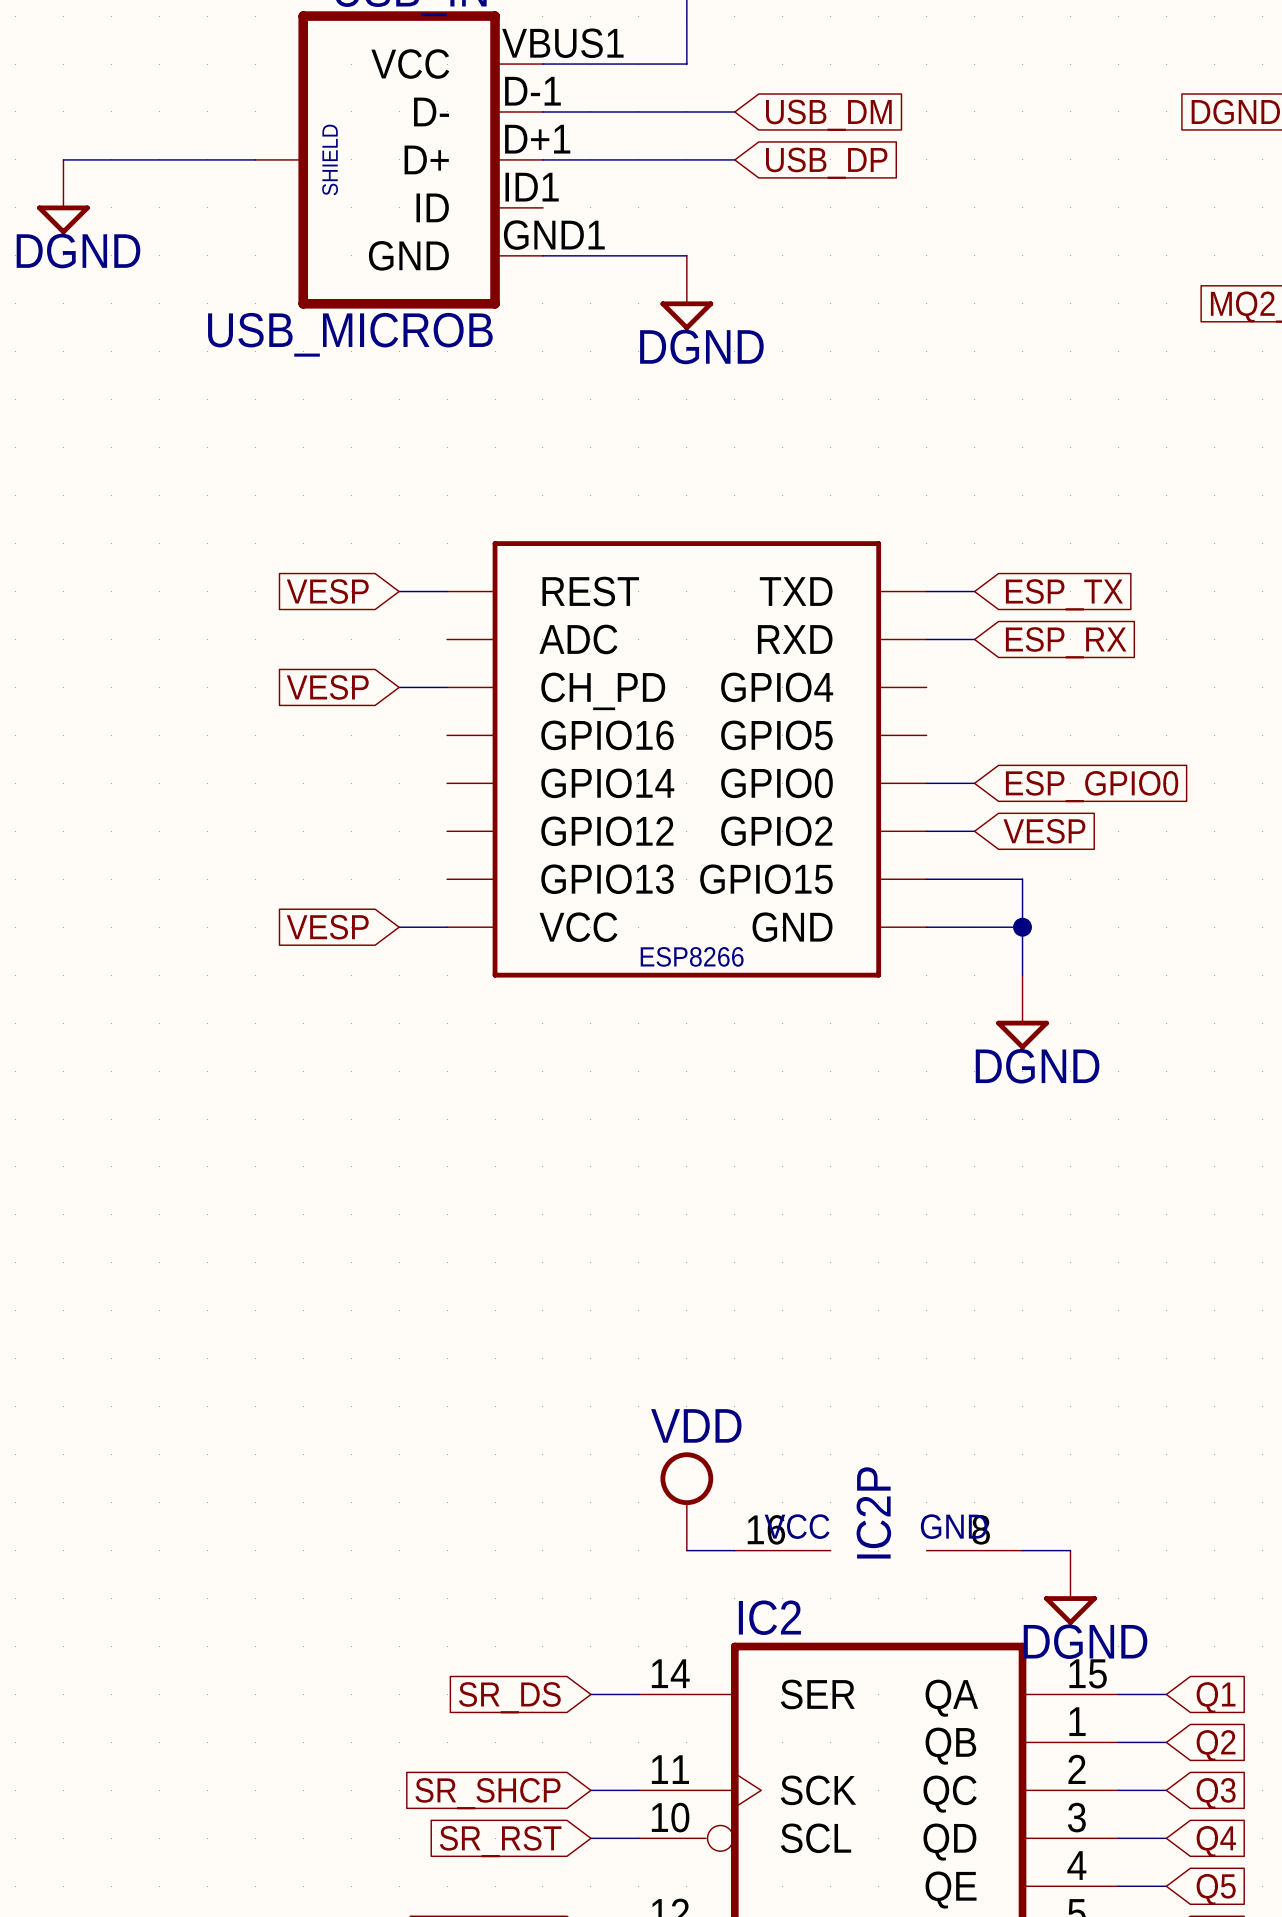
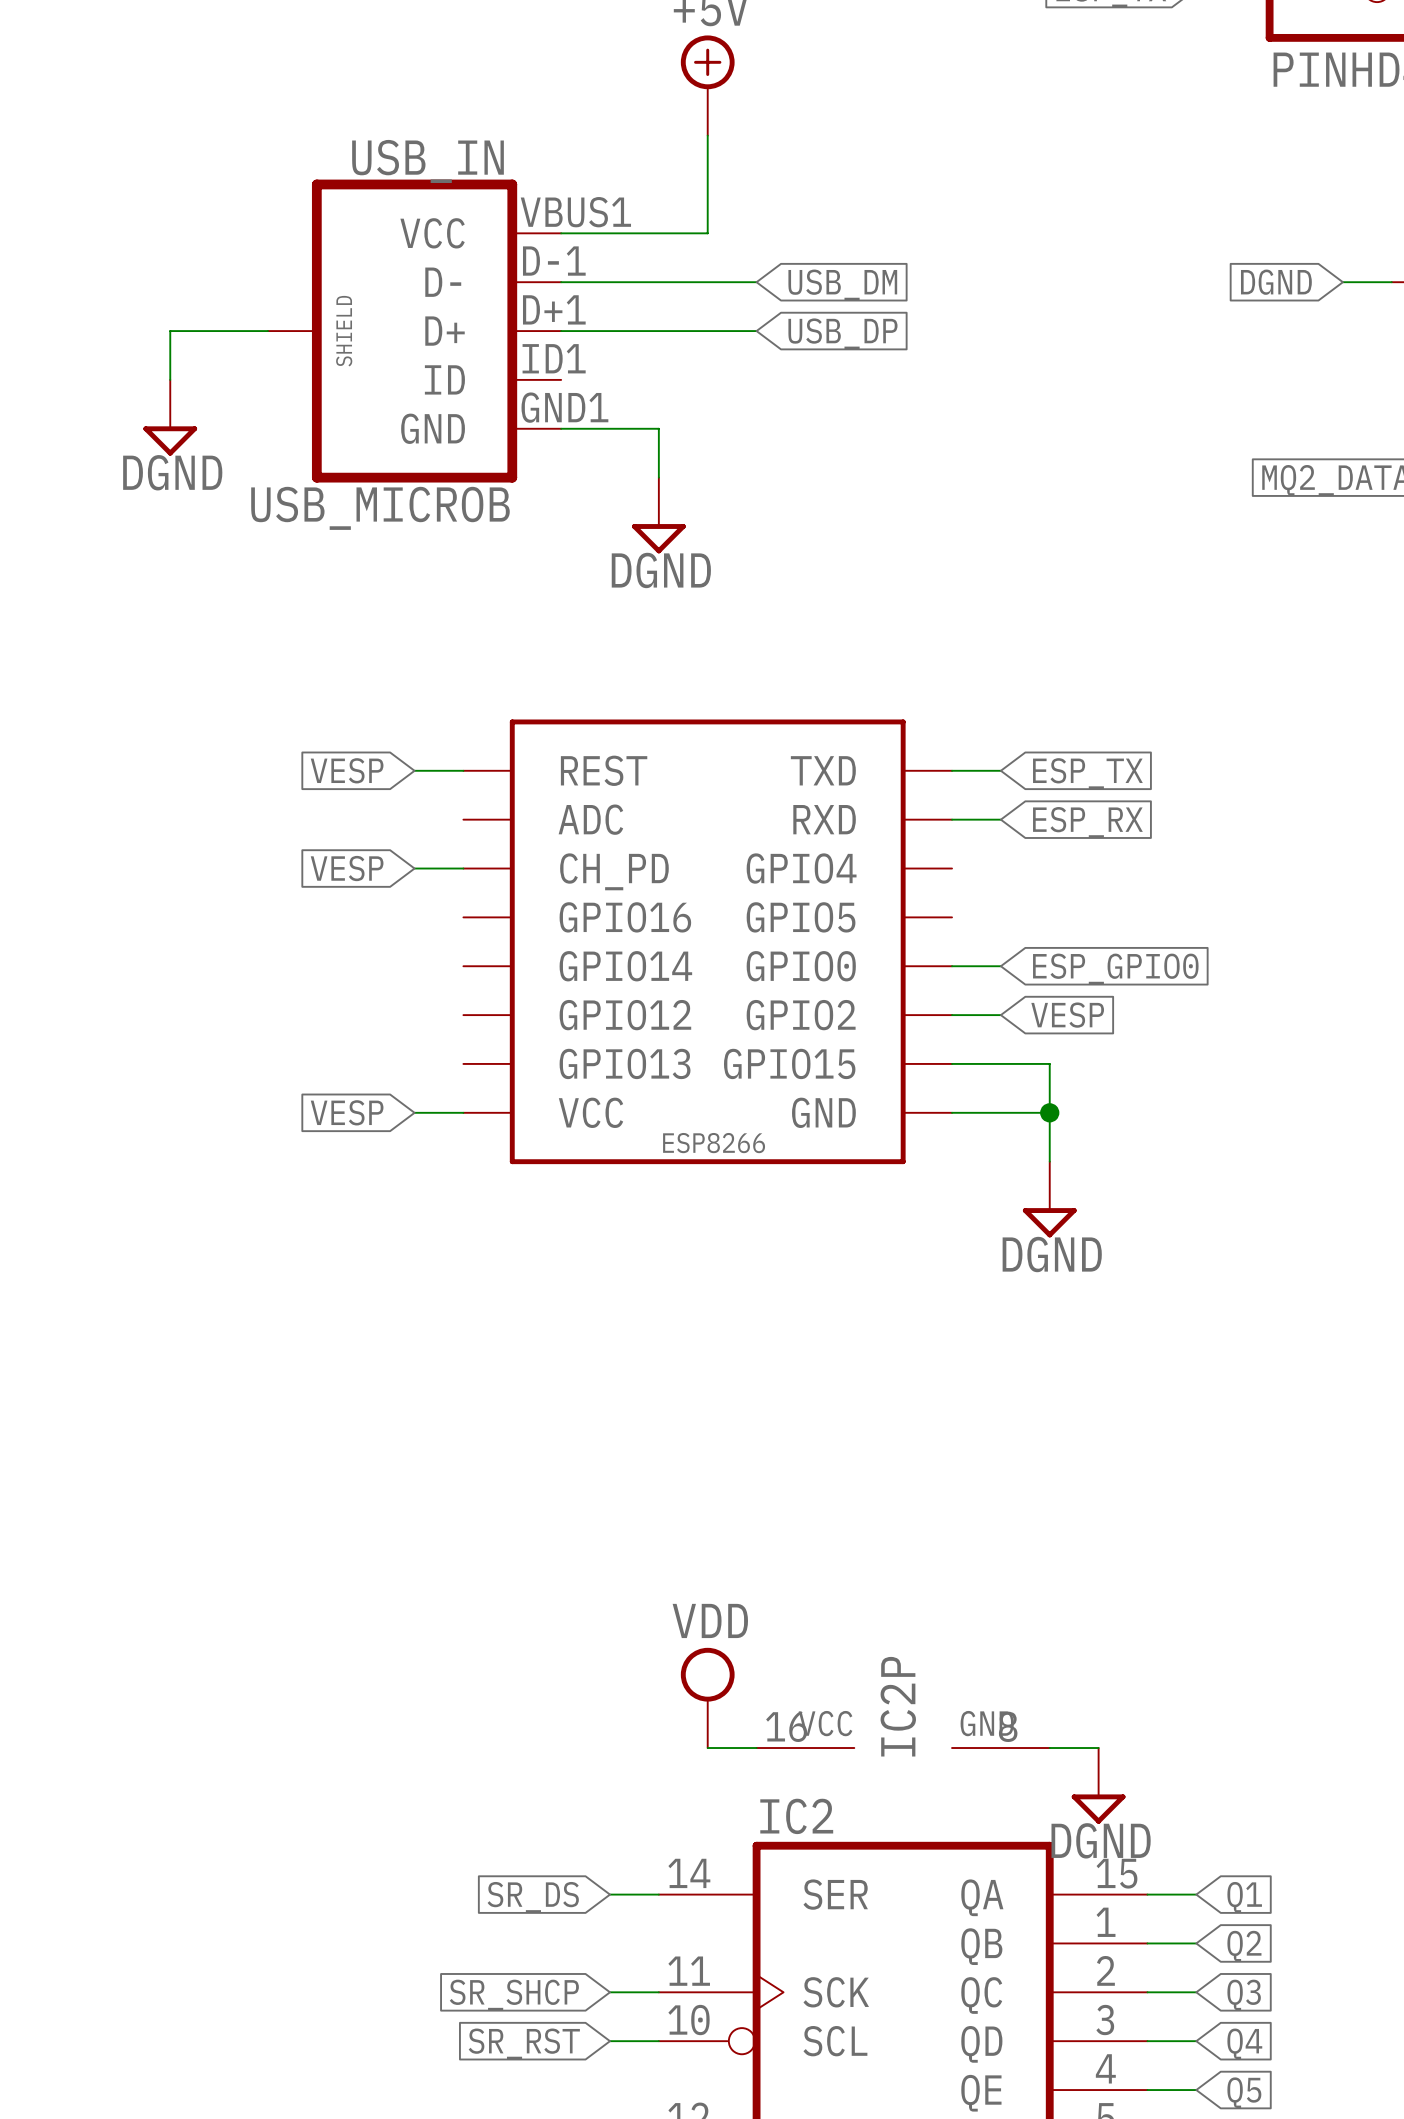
wire: (63, 159) (159, 159) -> (170, 379) (170, 331)
power symbol position: DGND (63, 197) -> DGND (170, 417)
wire: (638, 255) (686, 255) -> (658, 428) (658, 477)
power symbol position: DGND (686, 293) -> DGND (658, 515)

